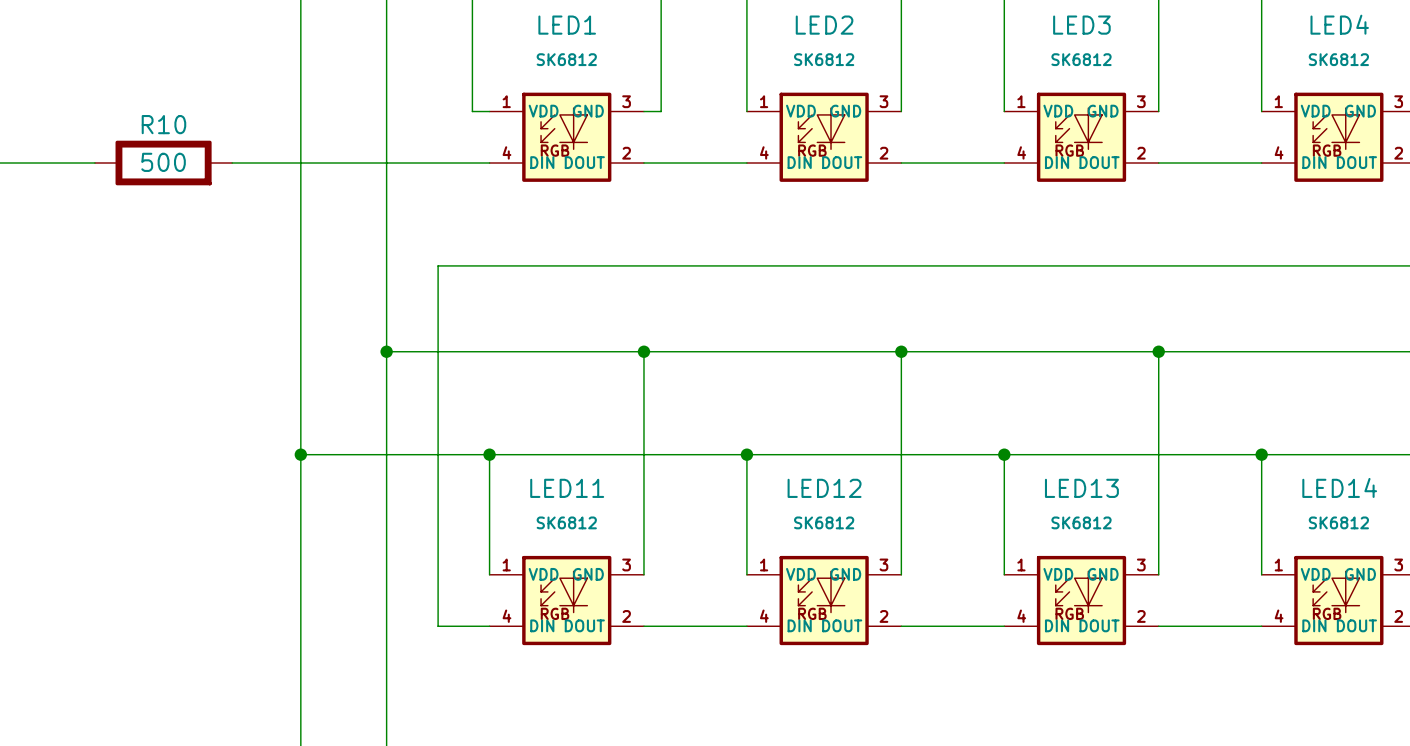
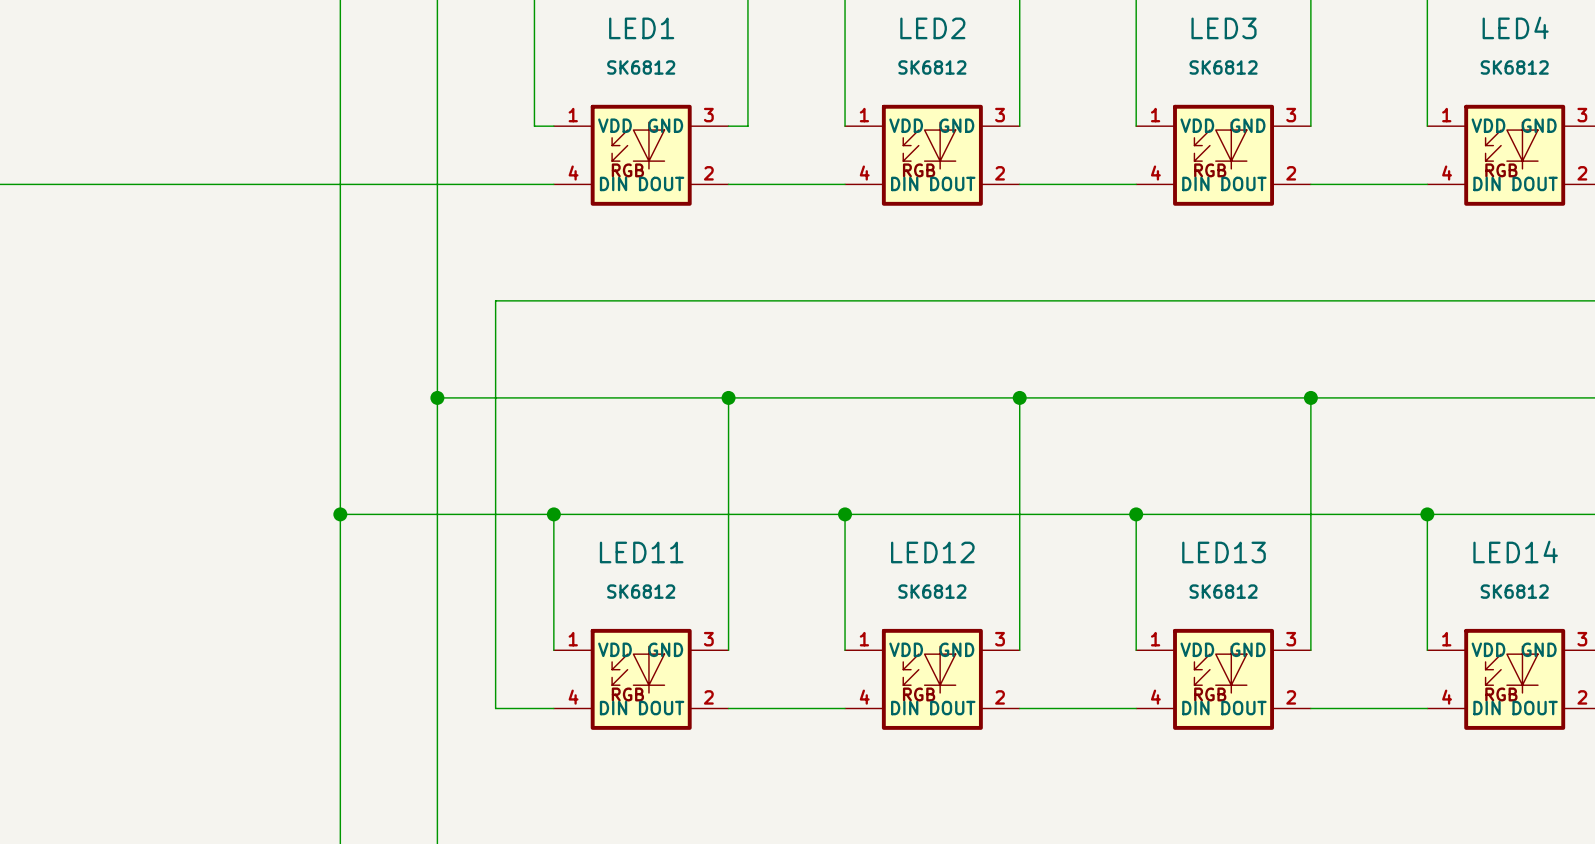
wire: none -> (107, 184) (262, 184)
R10: 500 (163, 163) -> none

